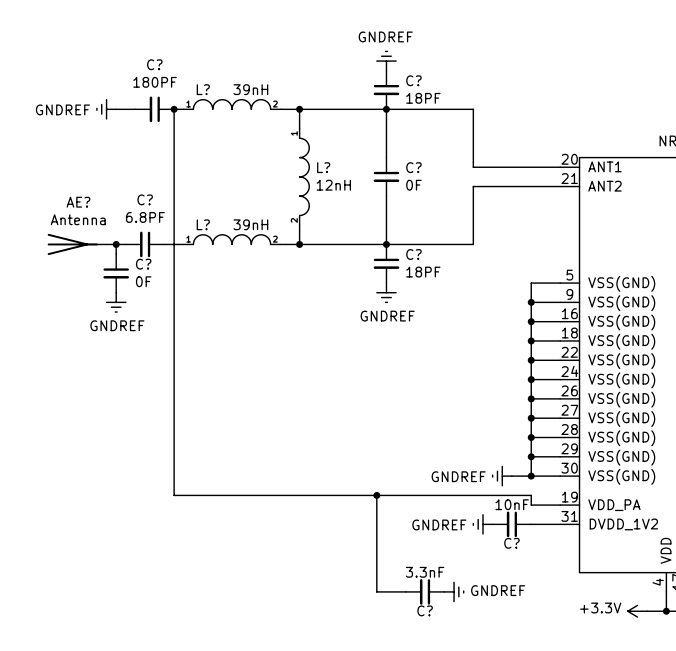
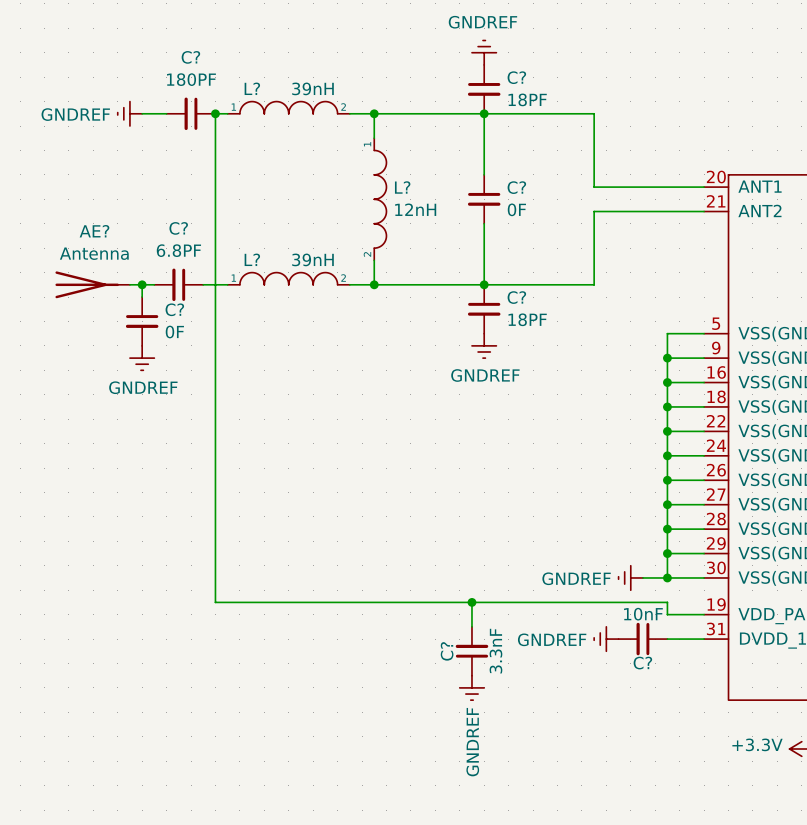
wire: (376, 514) (376, 591) (405, 591) -> none
C? rotation: 0° (425, 591) -> 90° clockwise (471, 651)
C? position: (425, 591) -> (471, 651)
power symbol rotation: 0° (454, 591) -> 90° clockwise (471, 687)
power symbol position: GNDREF (454, 591) -> GNDREF (471, 687)

